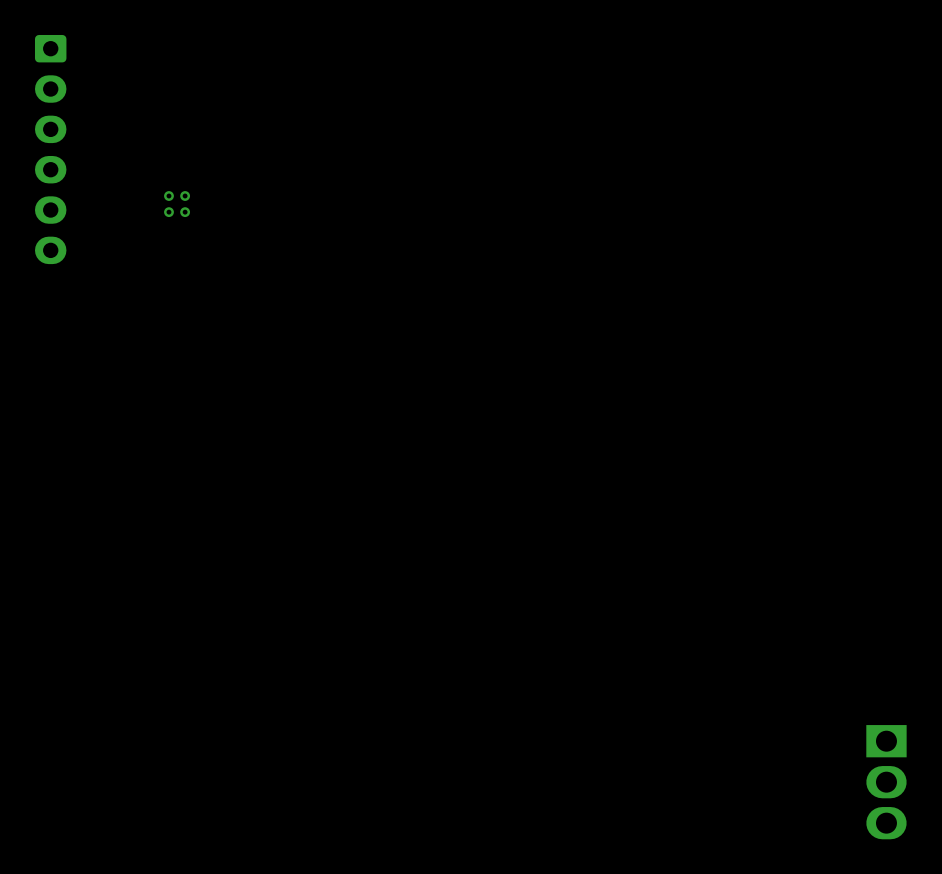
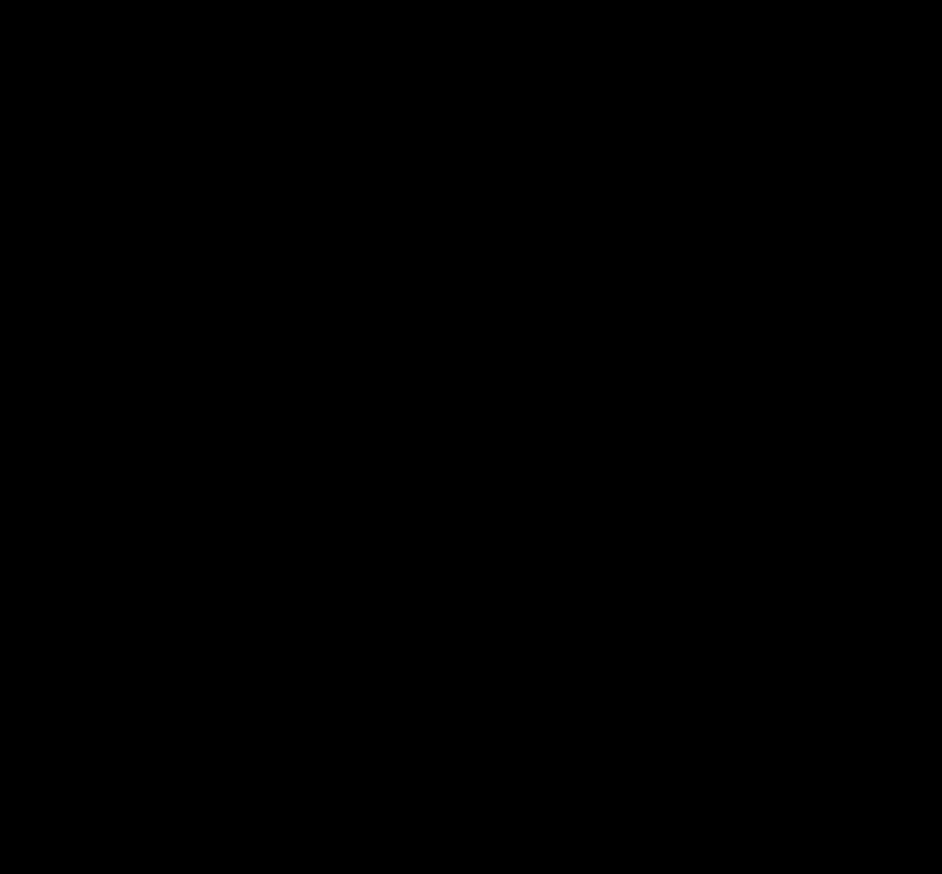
part: (50, 149) -> none
part: (177, 204) -> none
part: (886, 782) -> none

